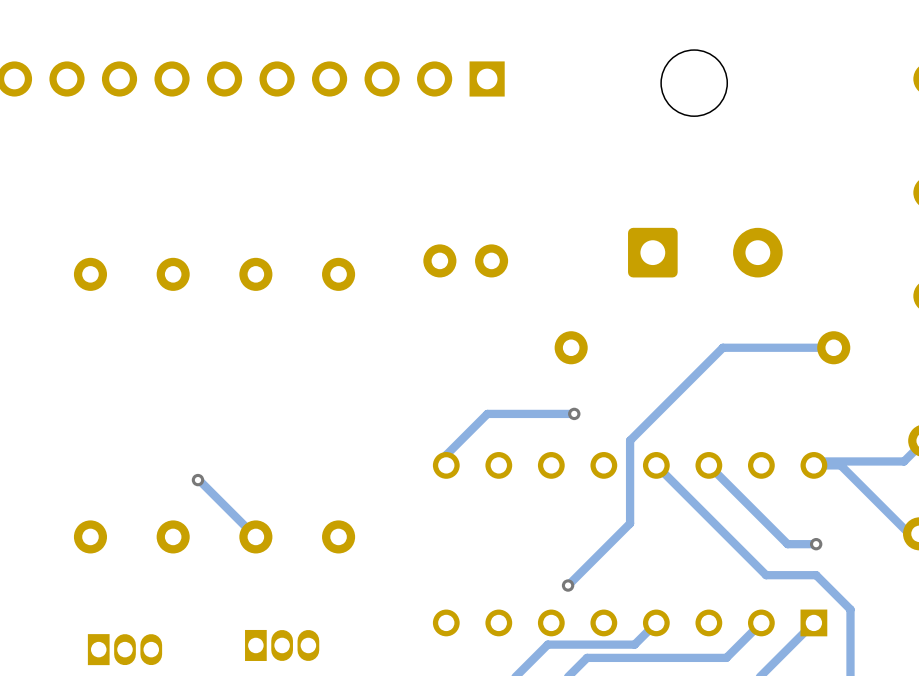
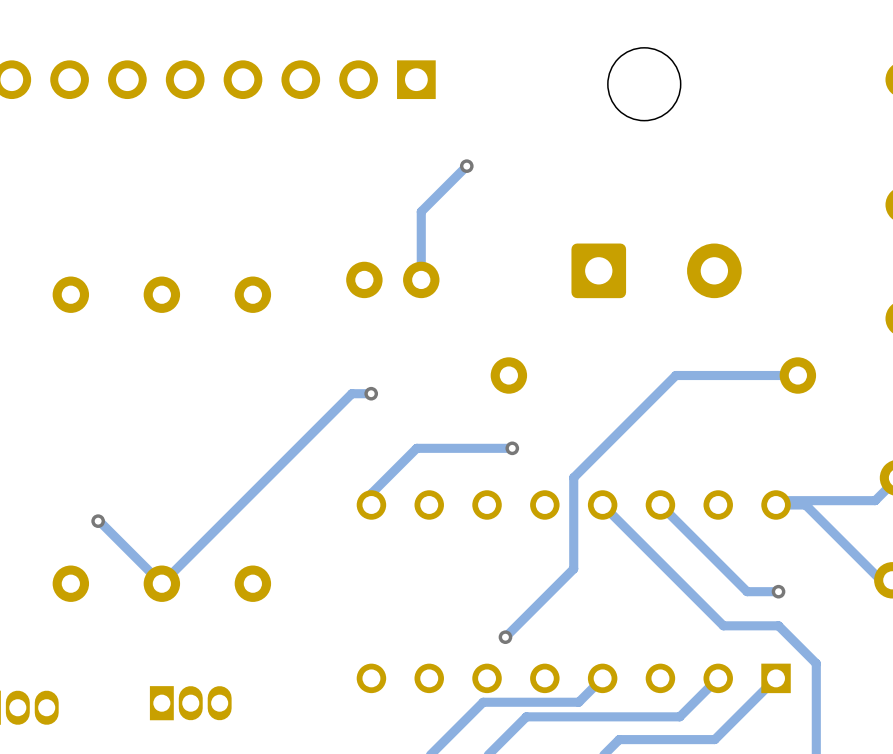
track: none -> (466, 166) (421, 211) (421, 279)
via: none -> (466, 166)
track: none -> (371, 393) (351, 393) (161, 583)
via: none -> (371, 393)

